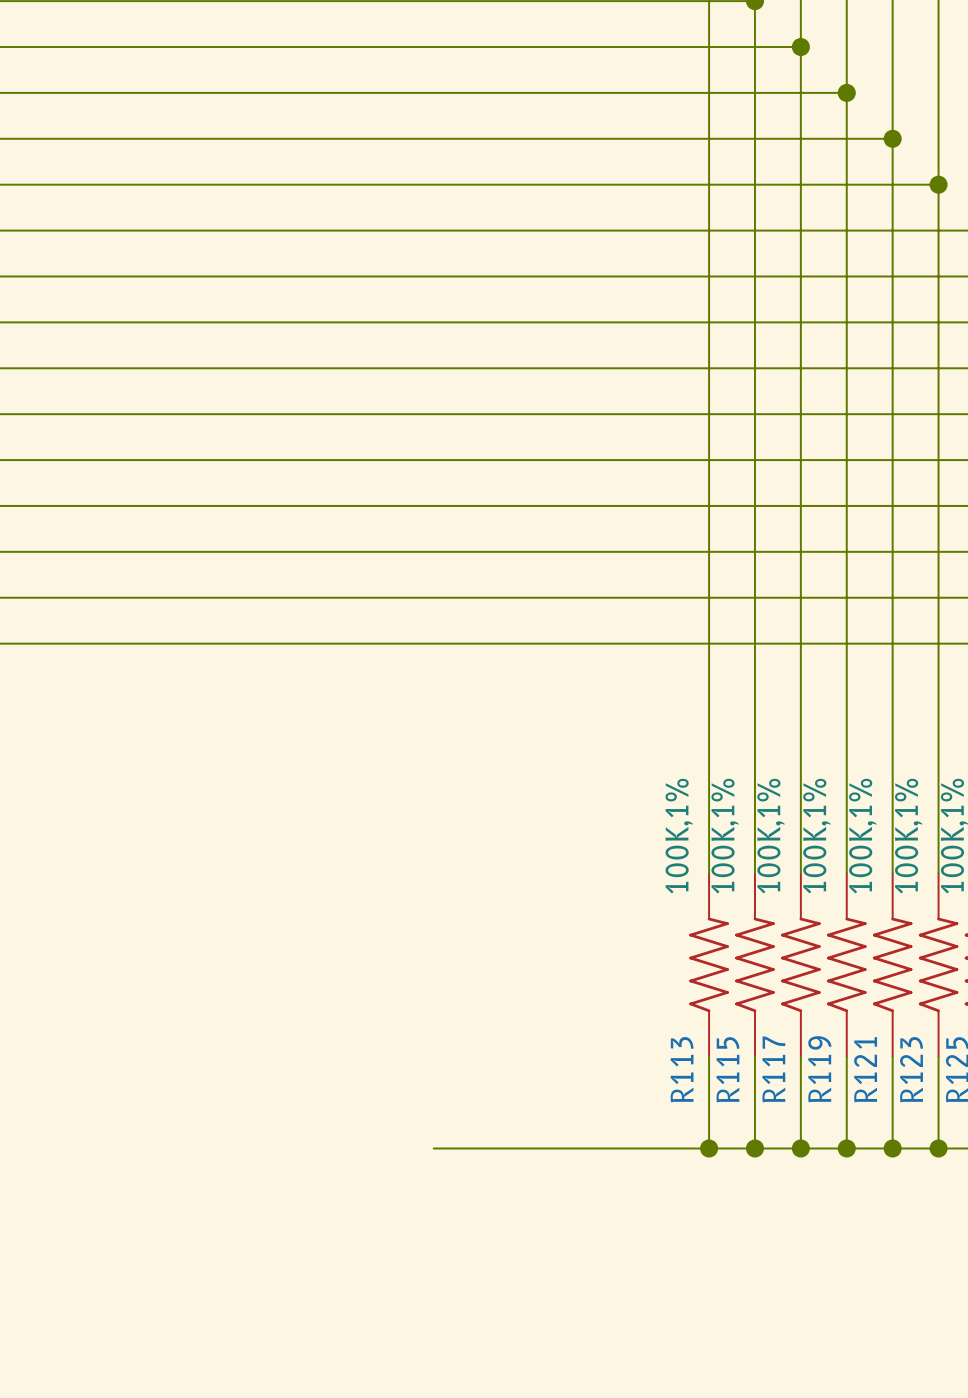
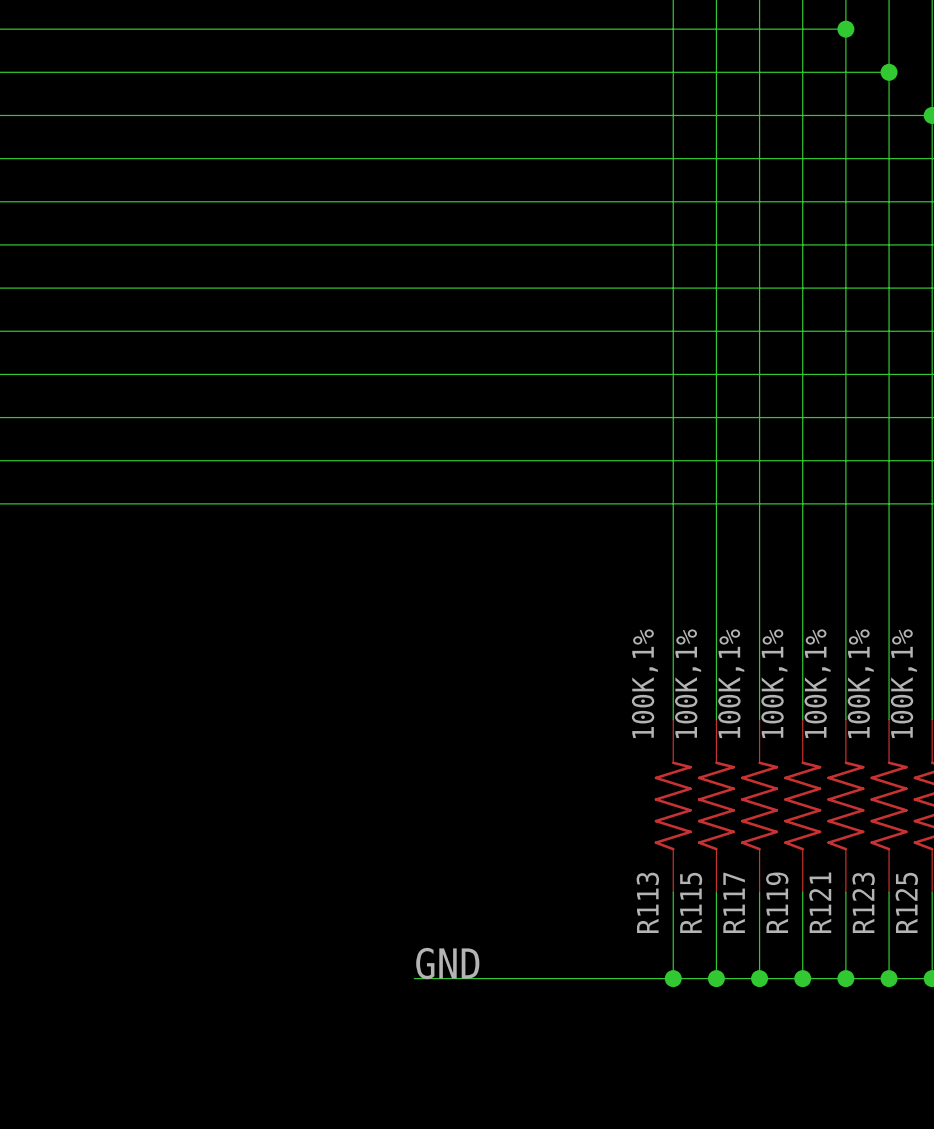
label: none -> GND (447, 963)

